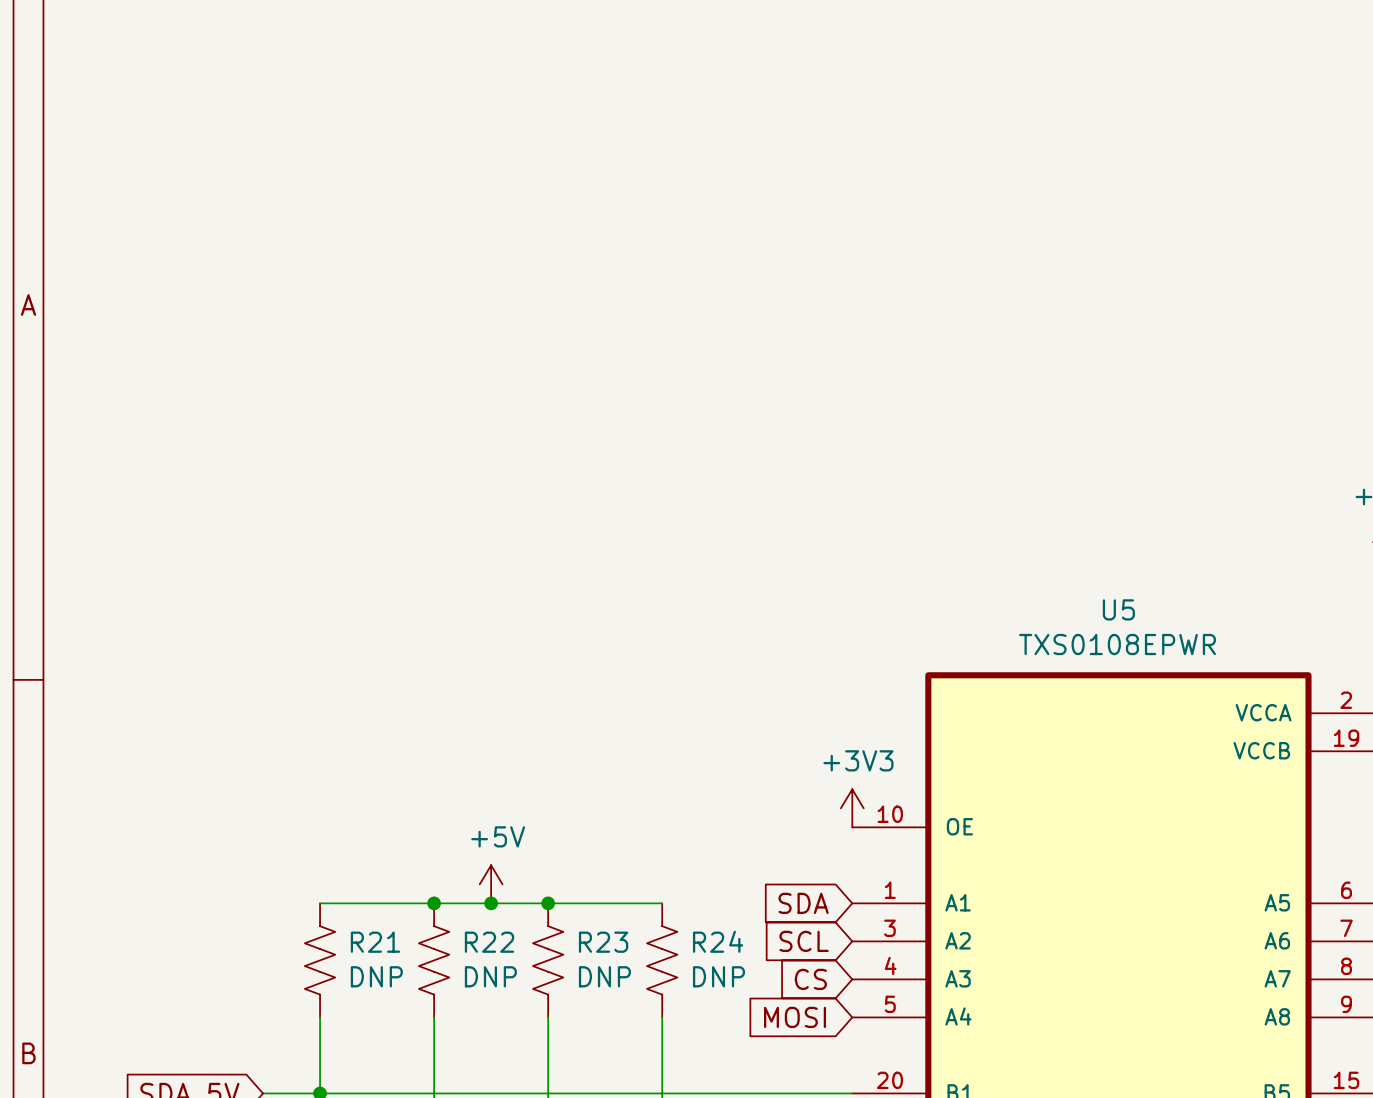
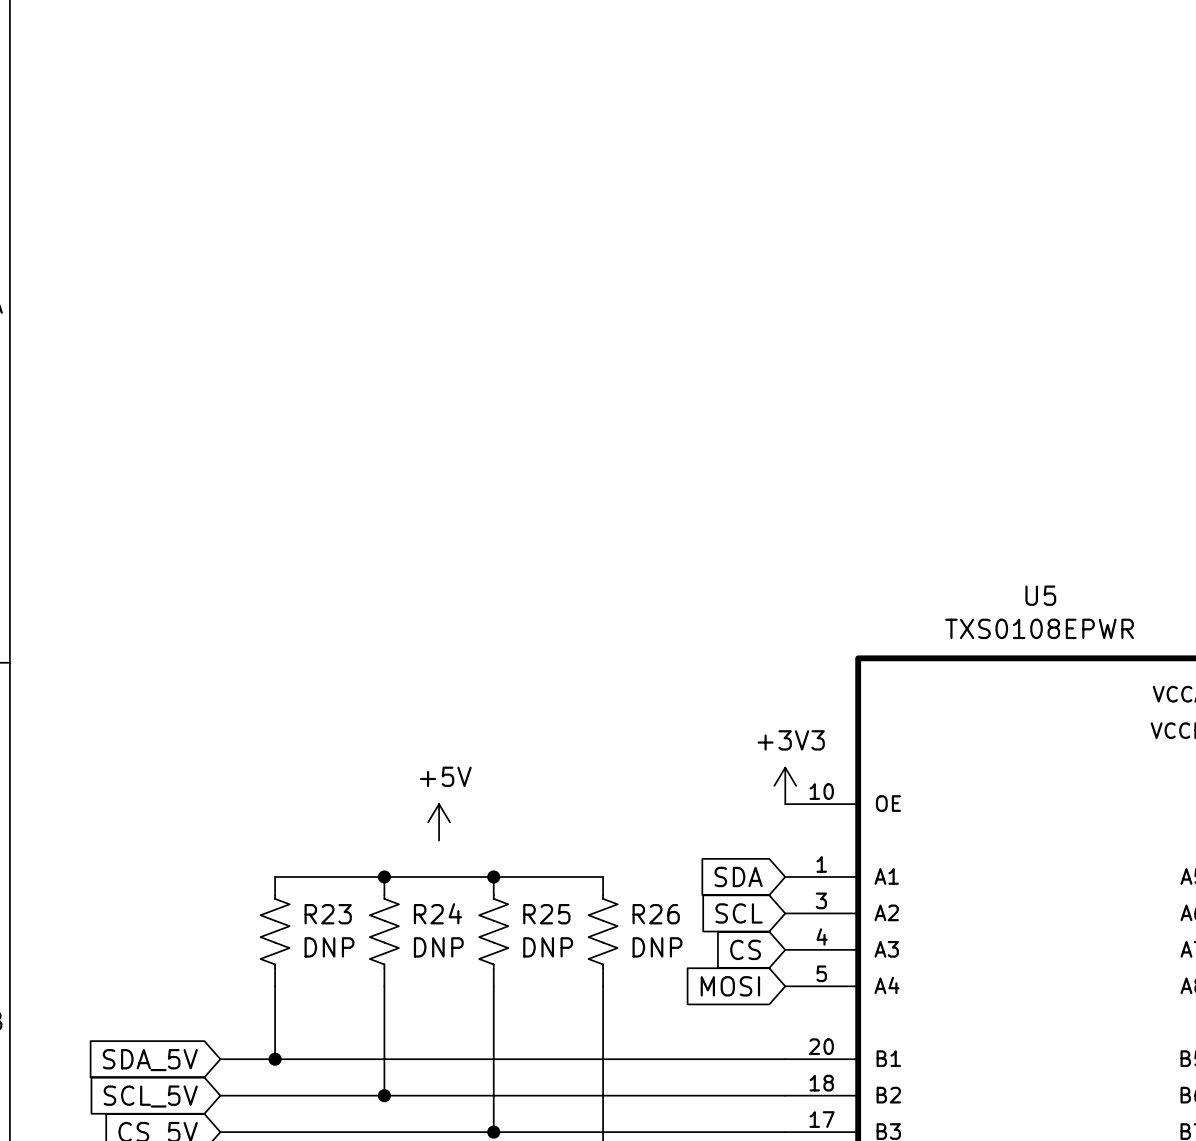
power symbol position: +5V (491, 884) -> +5V (439, 822)
junction: (491, 903) -> none
R24 name: R24 (718, 941) -> R26 (656, 914)
R21 name: R21 (375, 942) -> R23 (328, 914)
R22 name: R22 (489, 942) -> R24 (437, 913)
R23 name: R23 (603, 942) -> R25 (546, 914)

